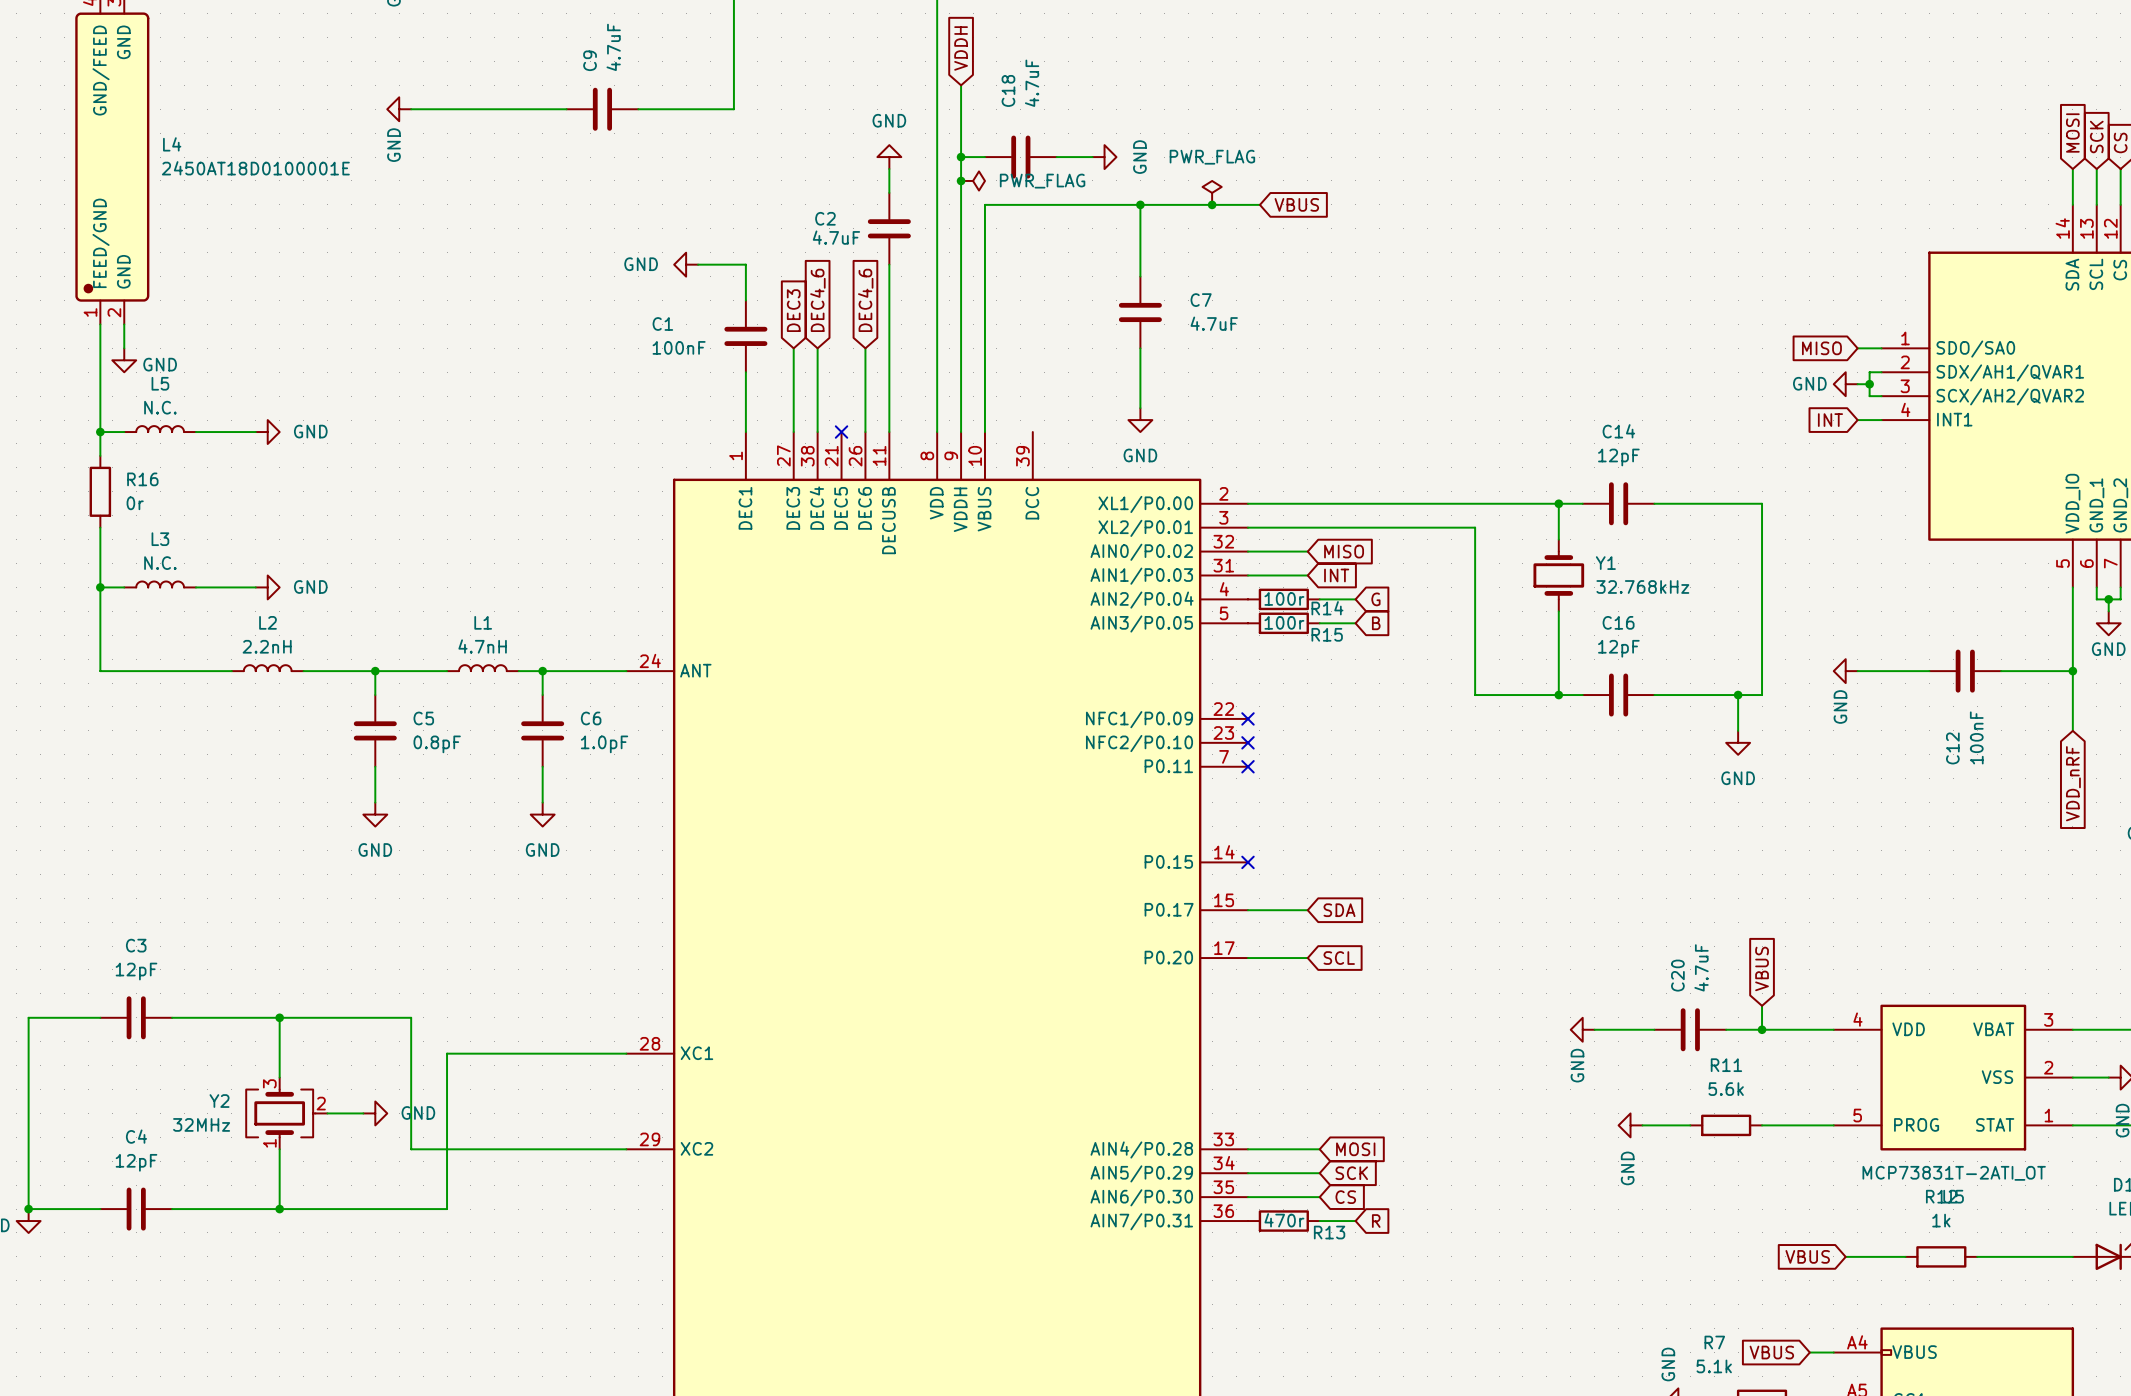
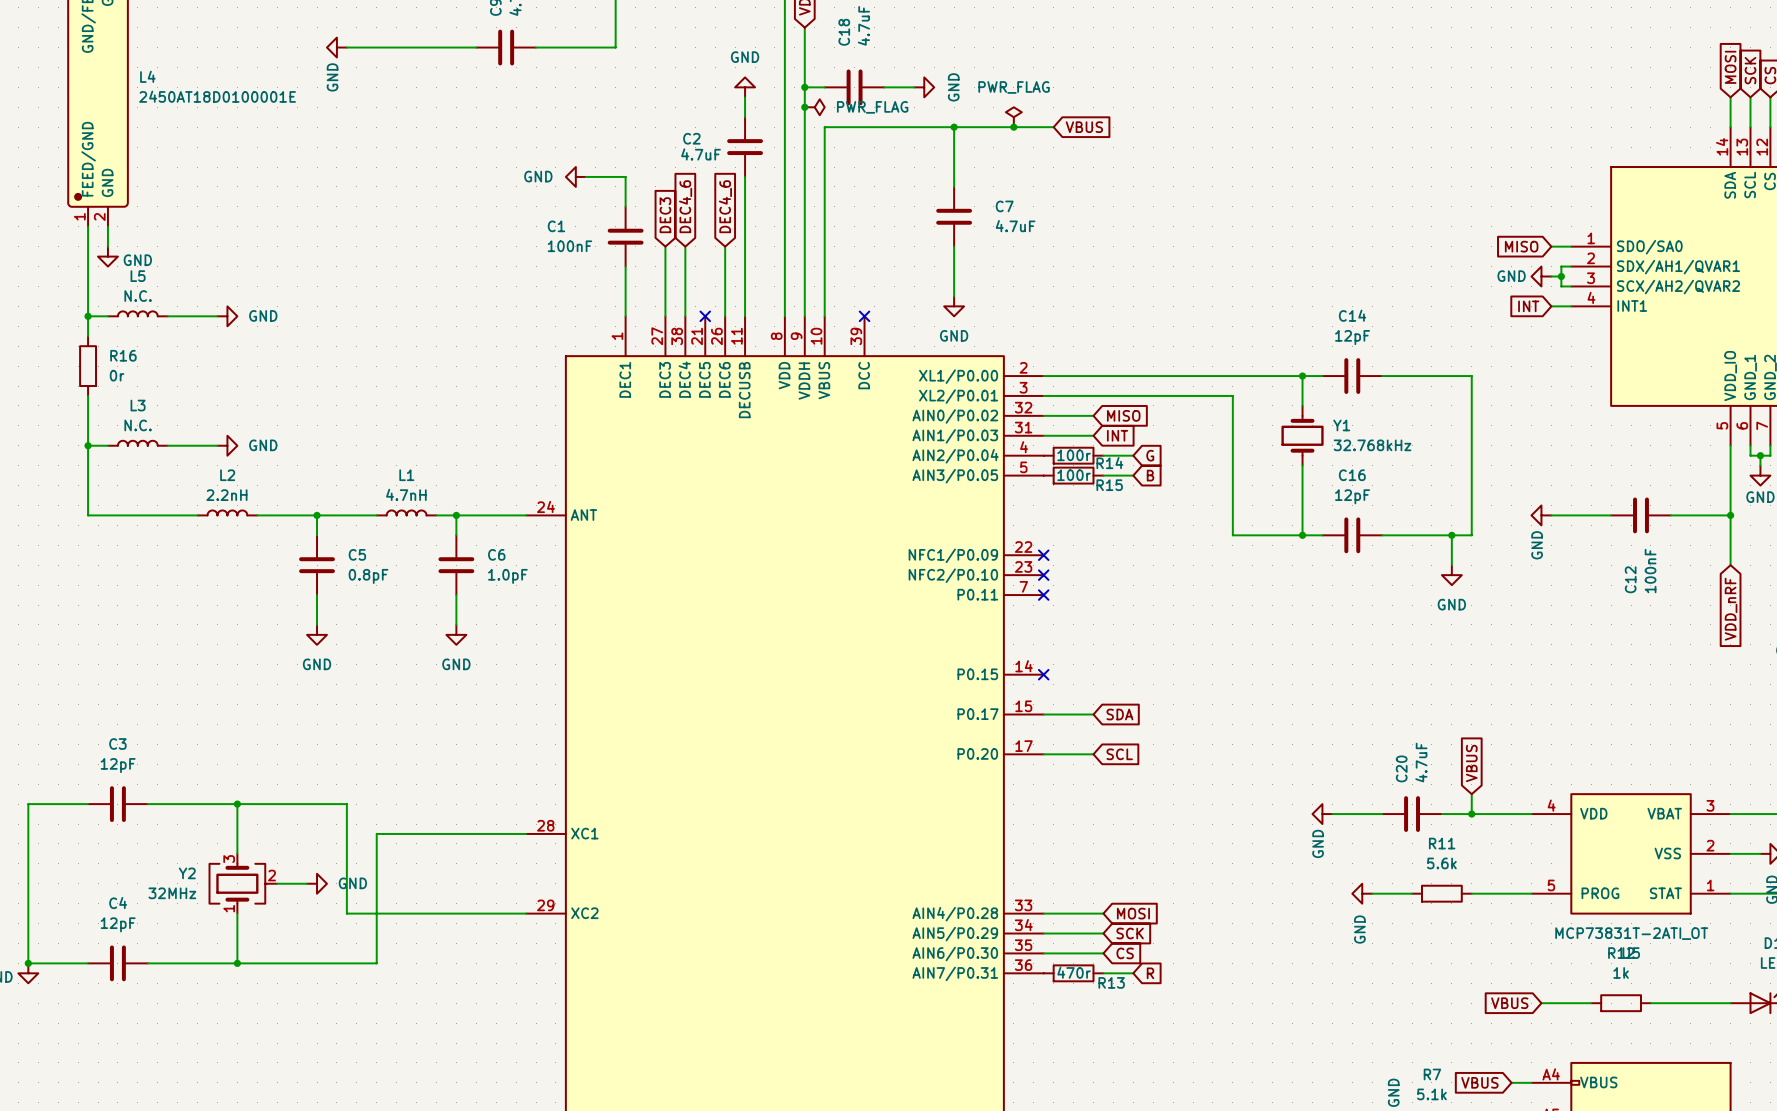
no-connect mark: none -> (864, 316)

